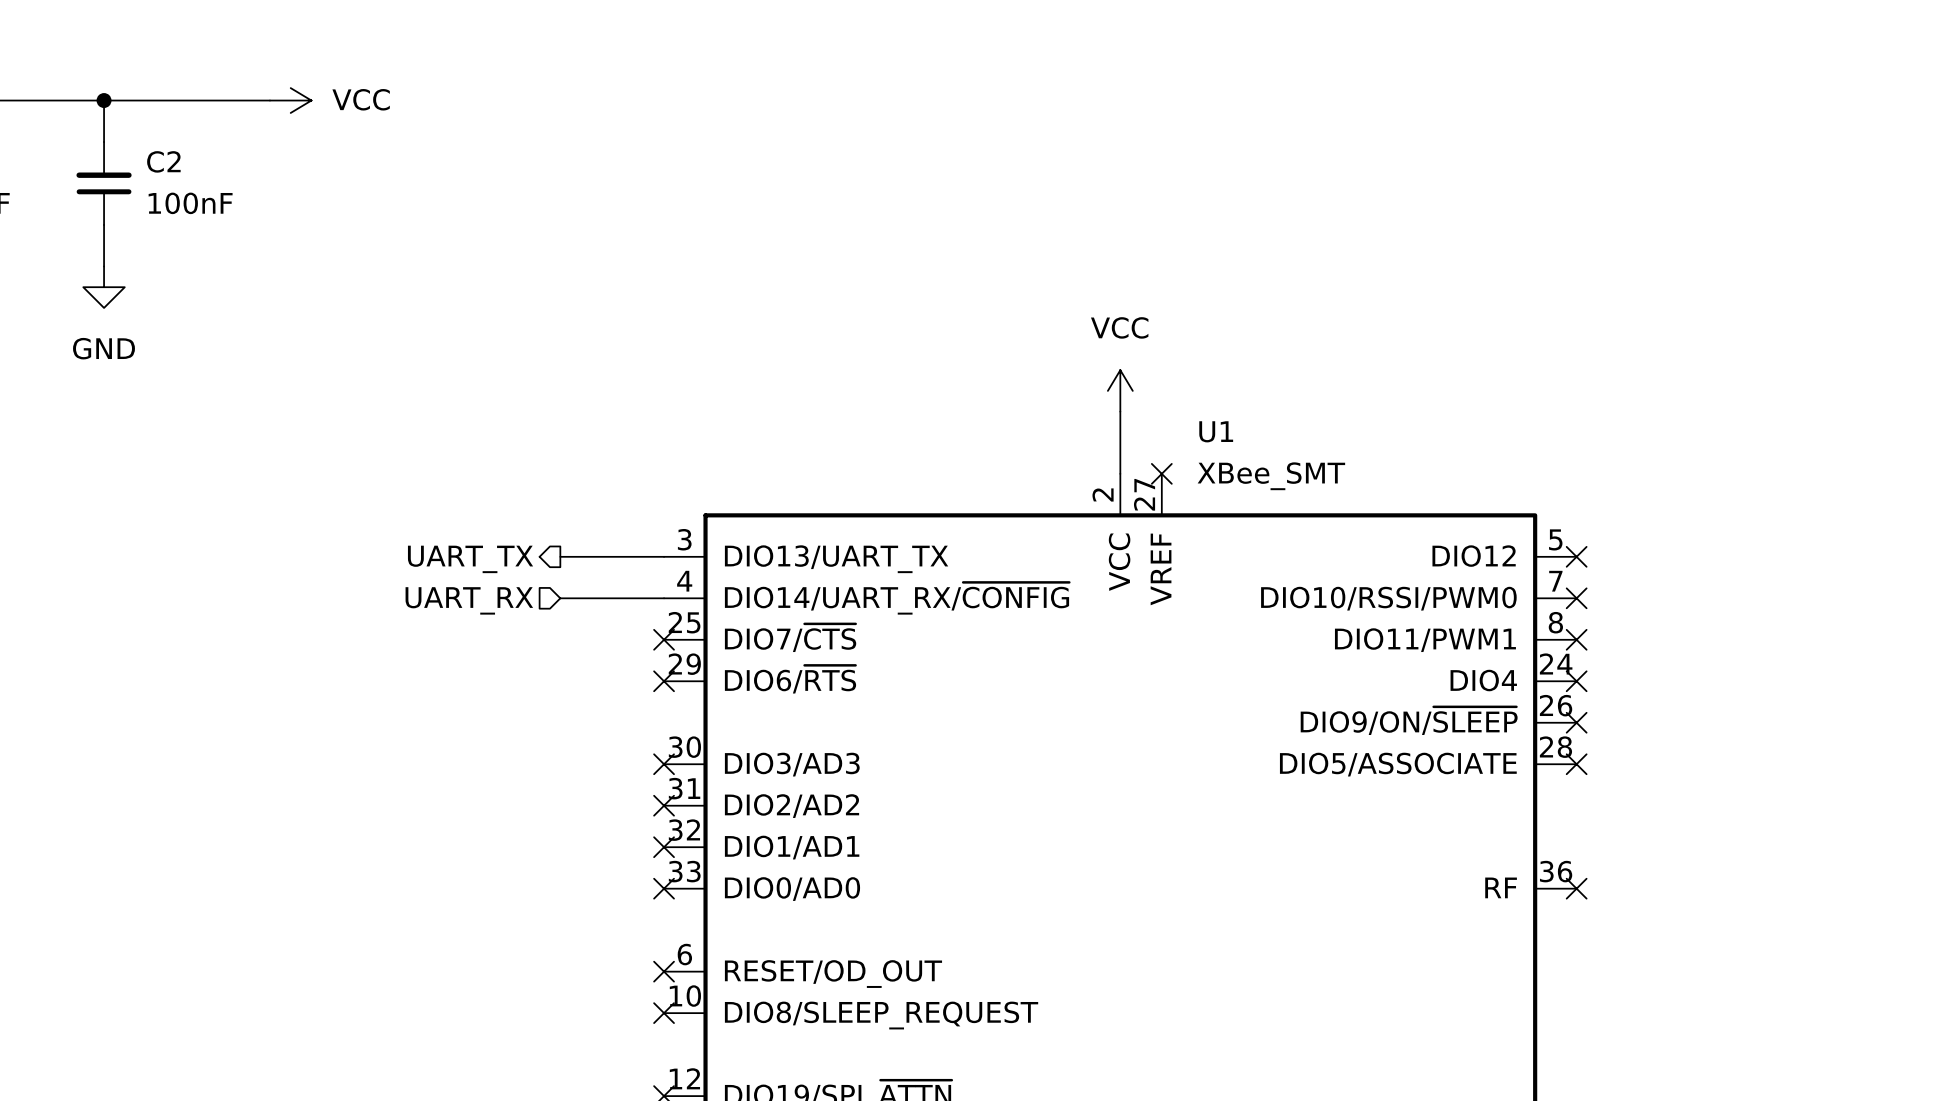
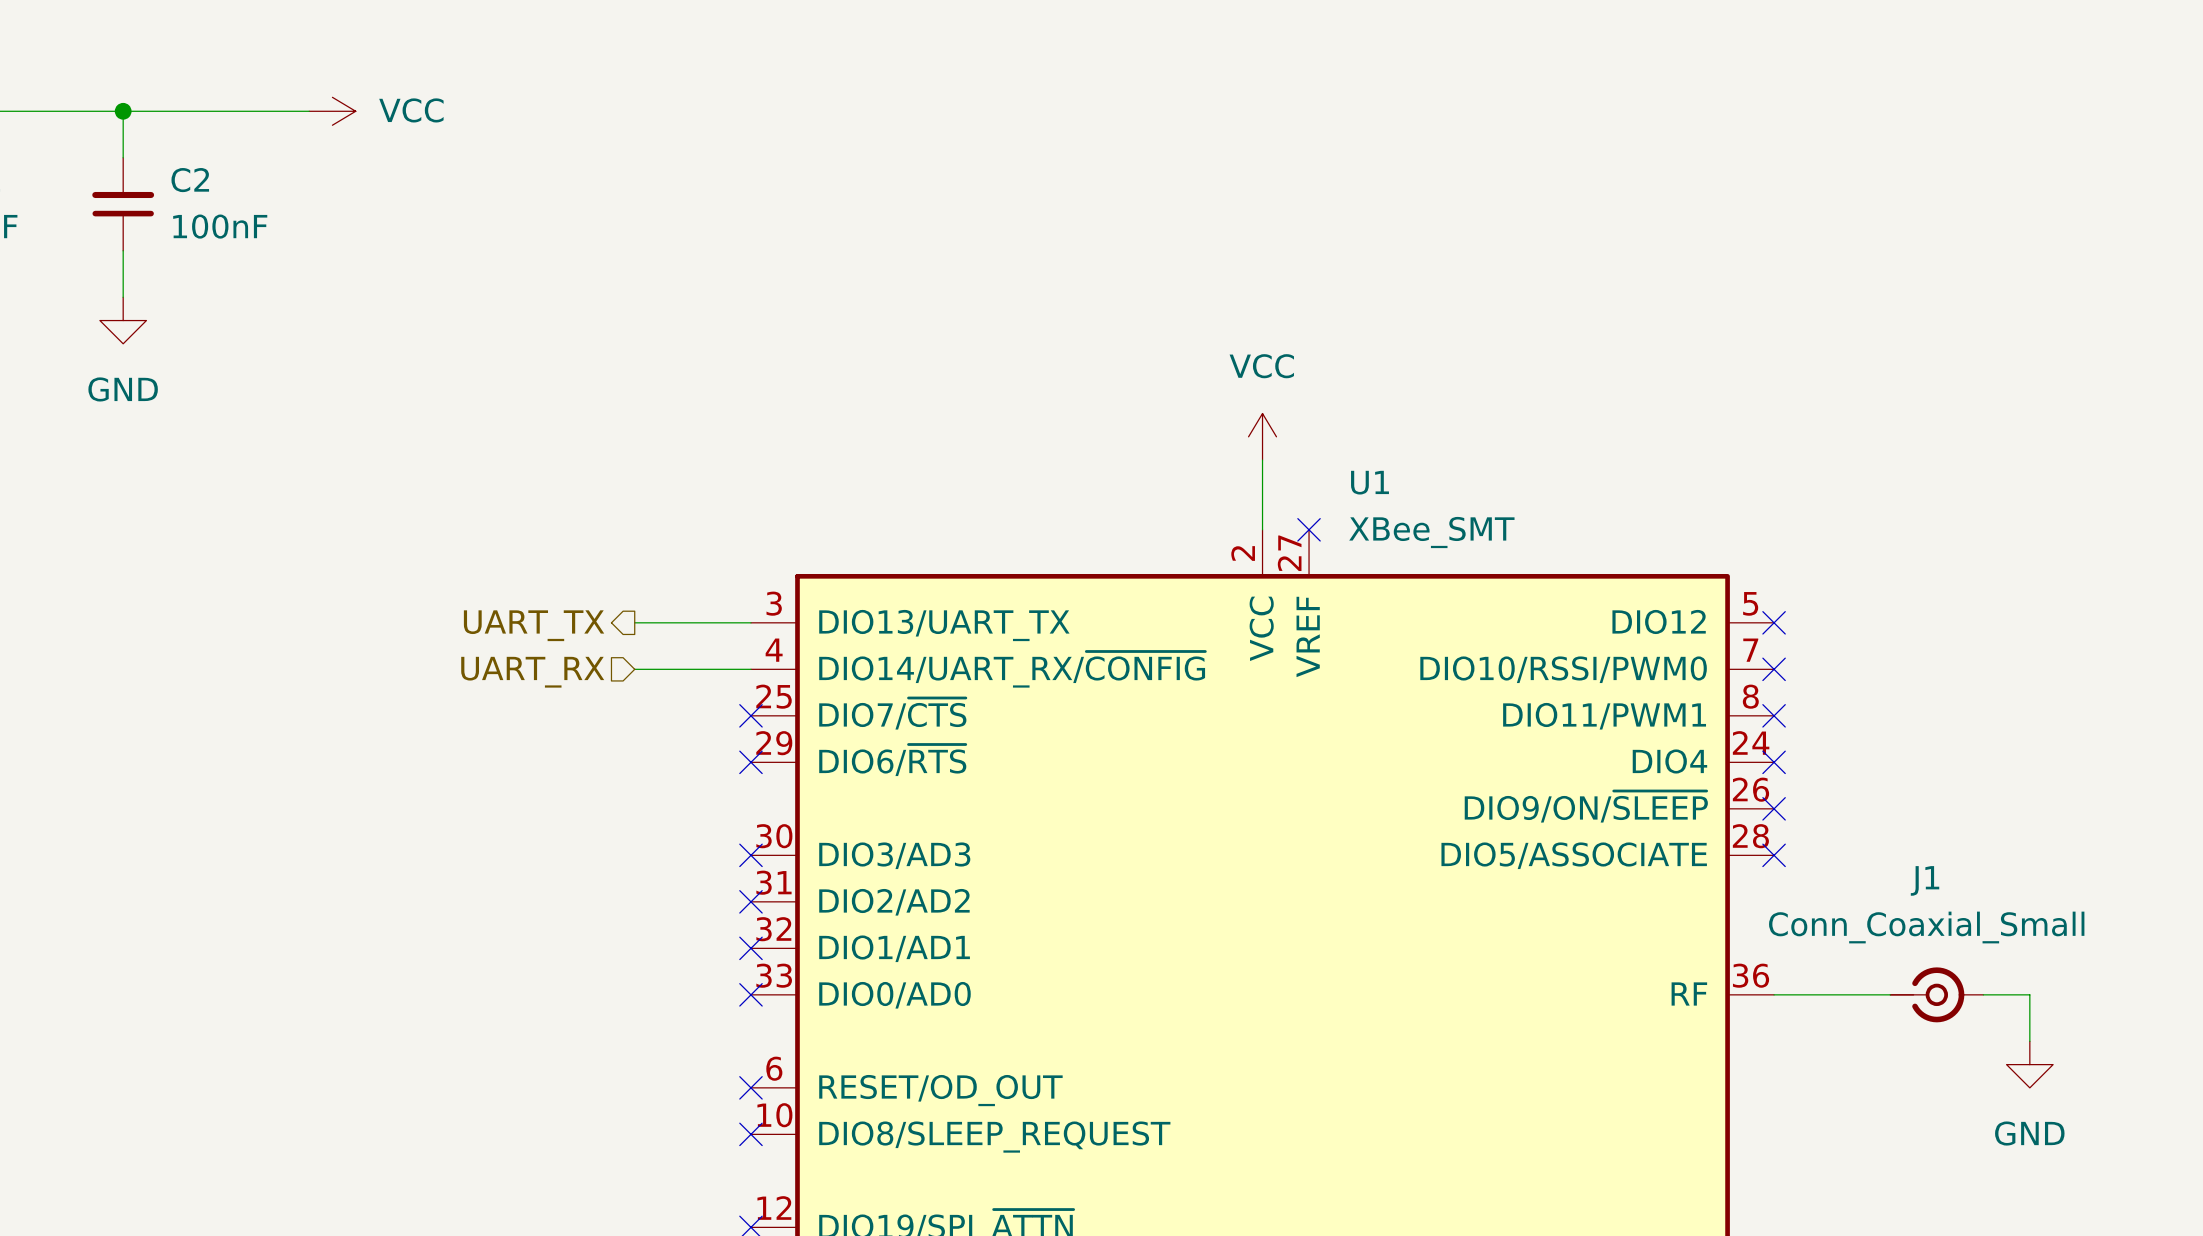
wire: none -> (1774, 994) (1890, 994)
no-connect mark: (1576, 888) -> none
J1: none -> Conn_Coaxial_Small (1936, 994)
wire: none -> (1983, 994) (2029, 994) (2029, 1041)
power symbol: none -> GND (2029, 1064)

